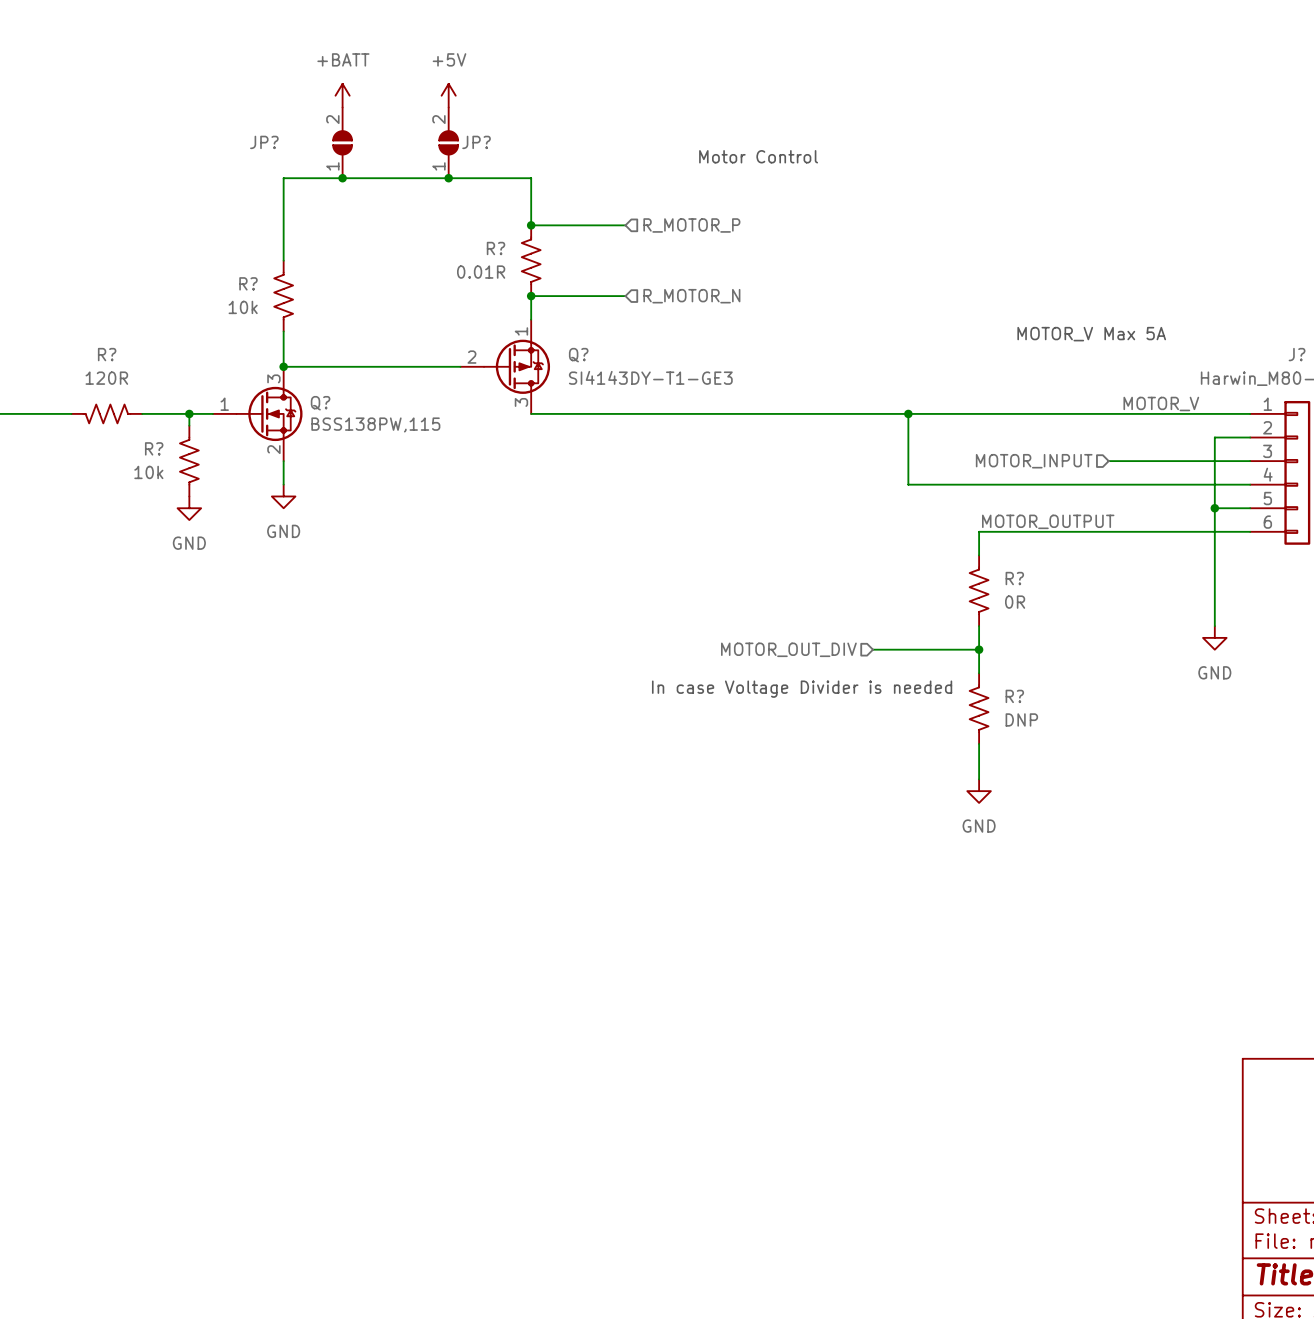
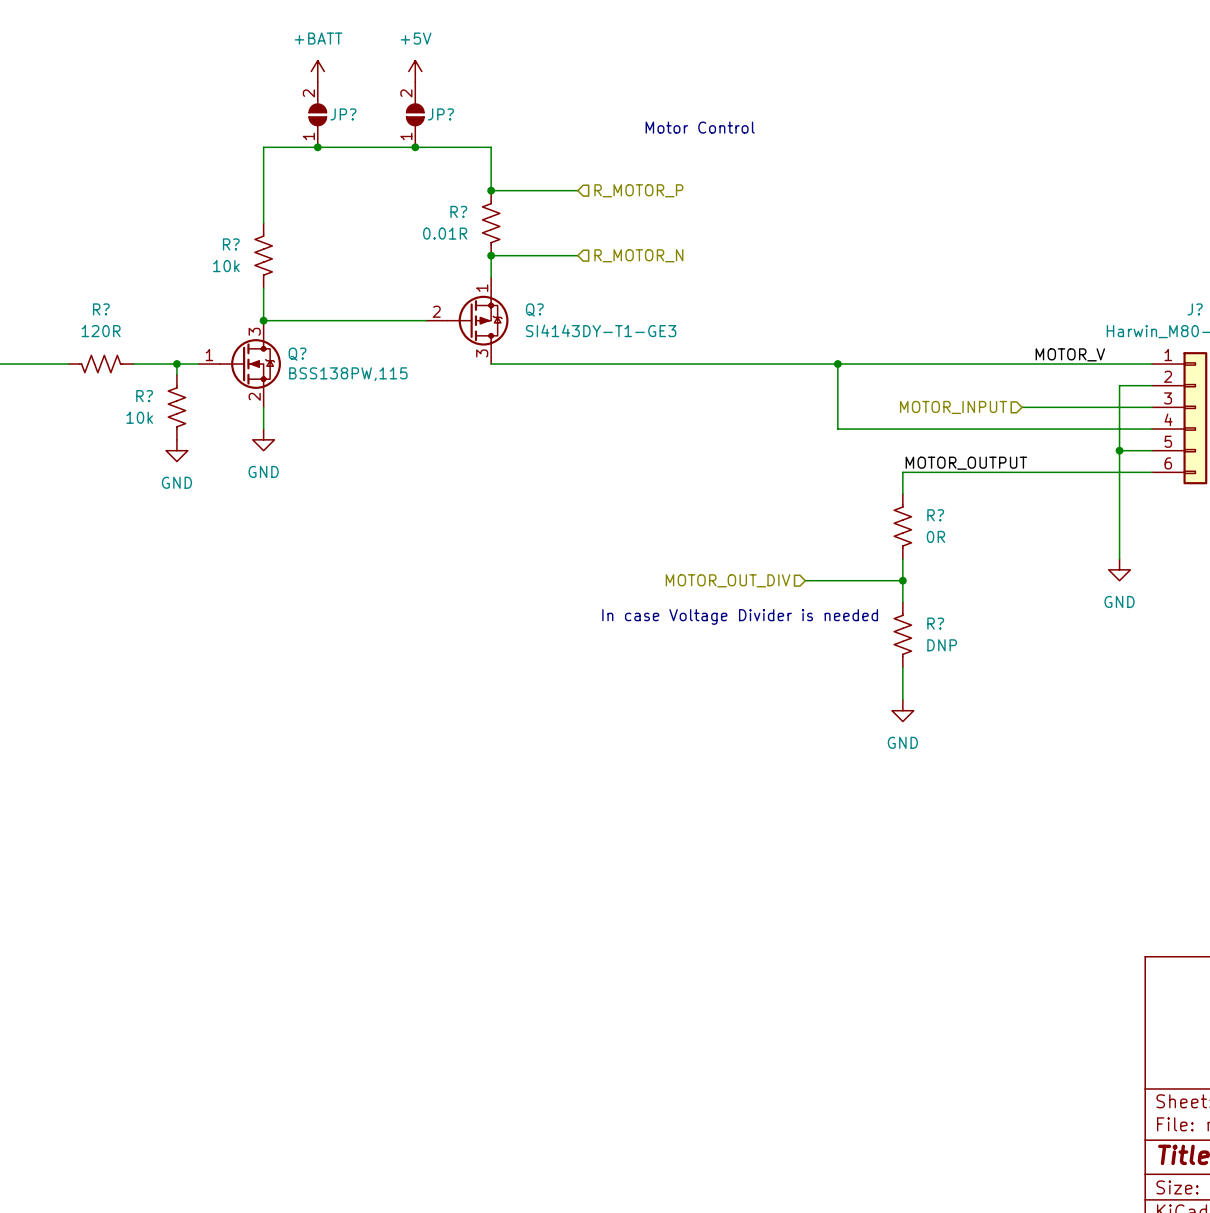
JP? name position: JP? (264, 142) -> JP? (343, 114)
text: MOTOR_V Max 5A (1091, 334) -> none

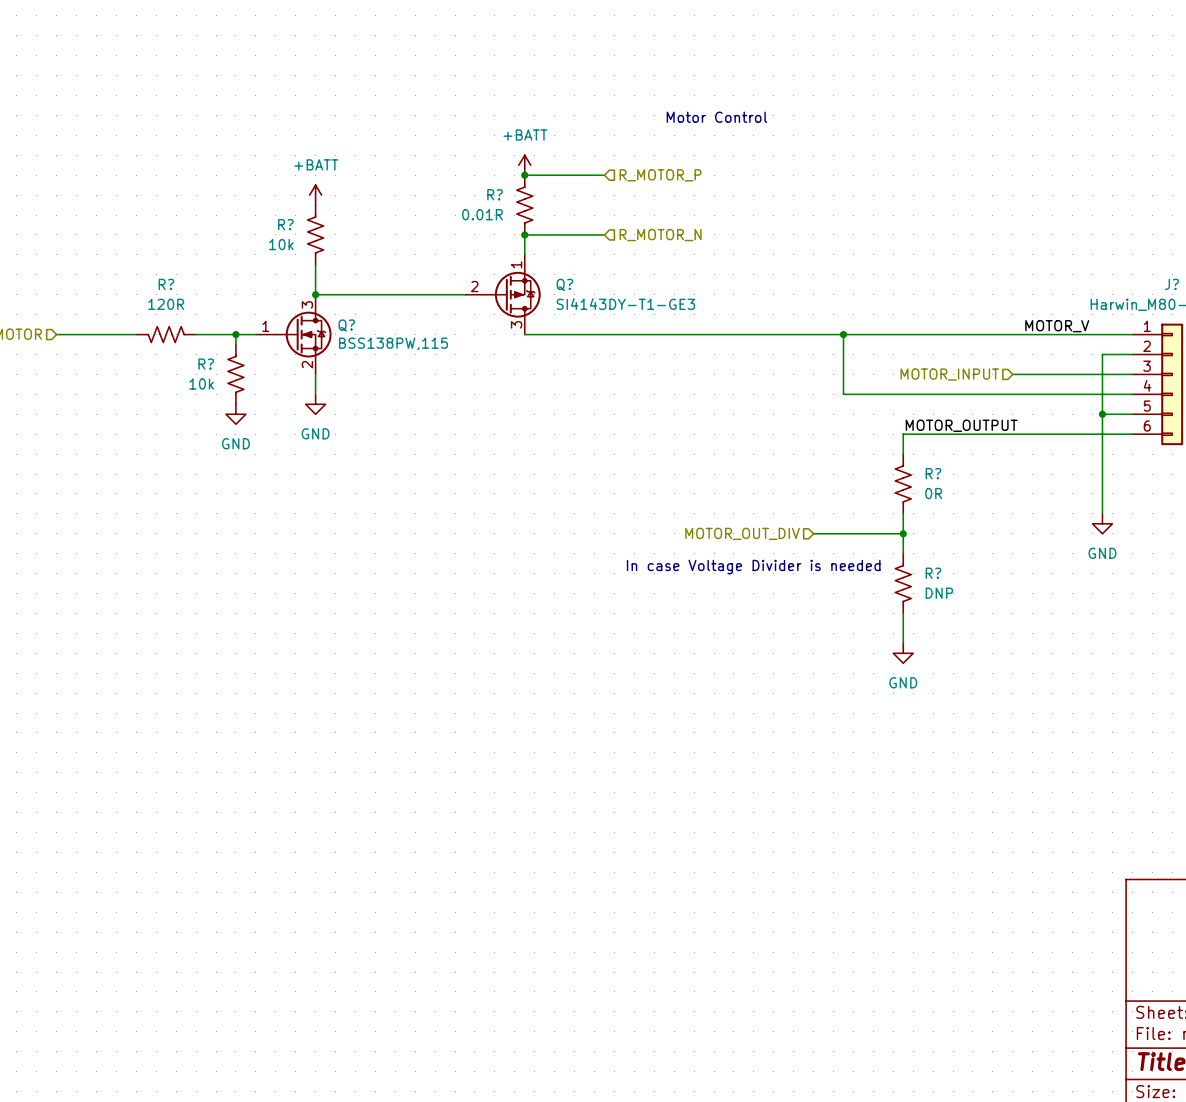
power symbol: +BATT (317, 71) -> none
power symbol: +5V (415, 71) -> none
JP?: (317, 114) -> none
JP?: (415, 114) -> none
junction: (317, 147) -> none
junction: (415, 147) -> none
power symbol: none -> +BATT (524, 165)
wire: (491, 190) (491, 147) (263, 147) (263, 223) -> none
power symbol: none -> +BATT (315, 195)

